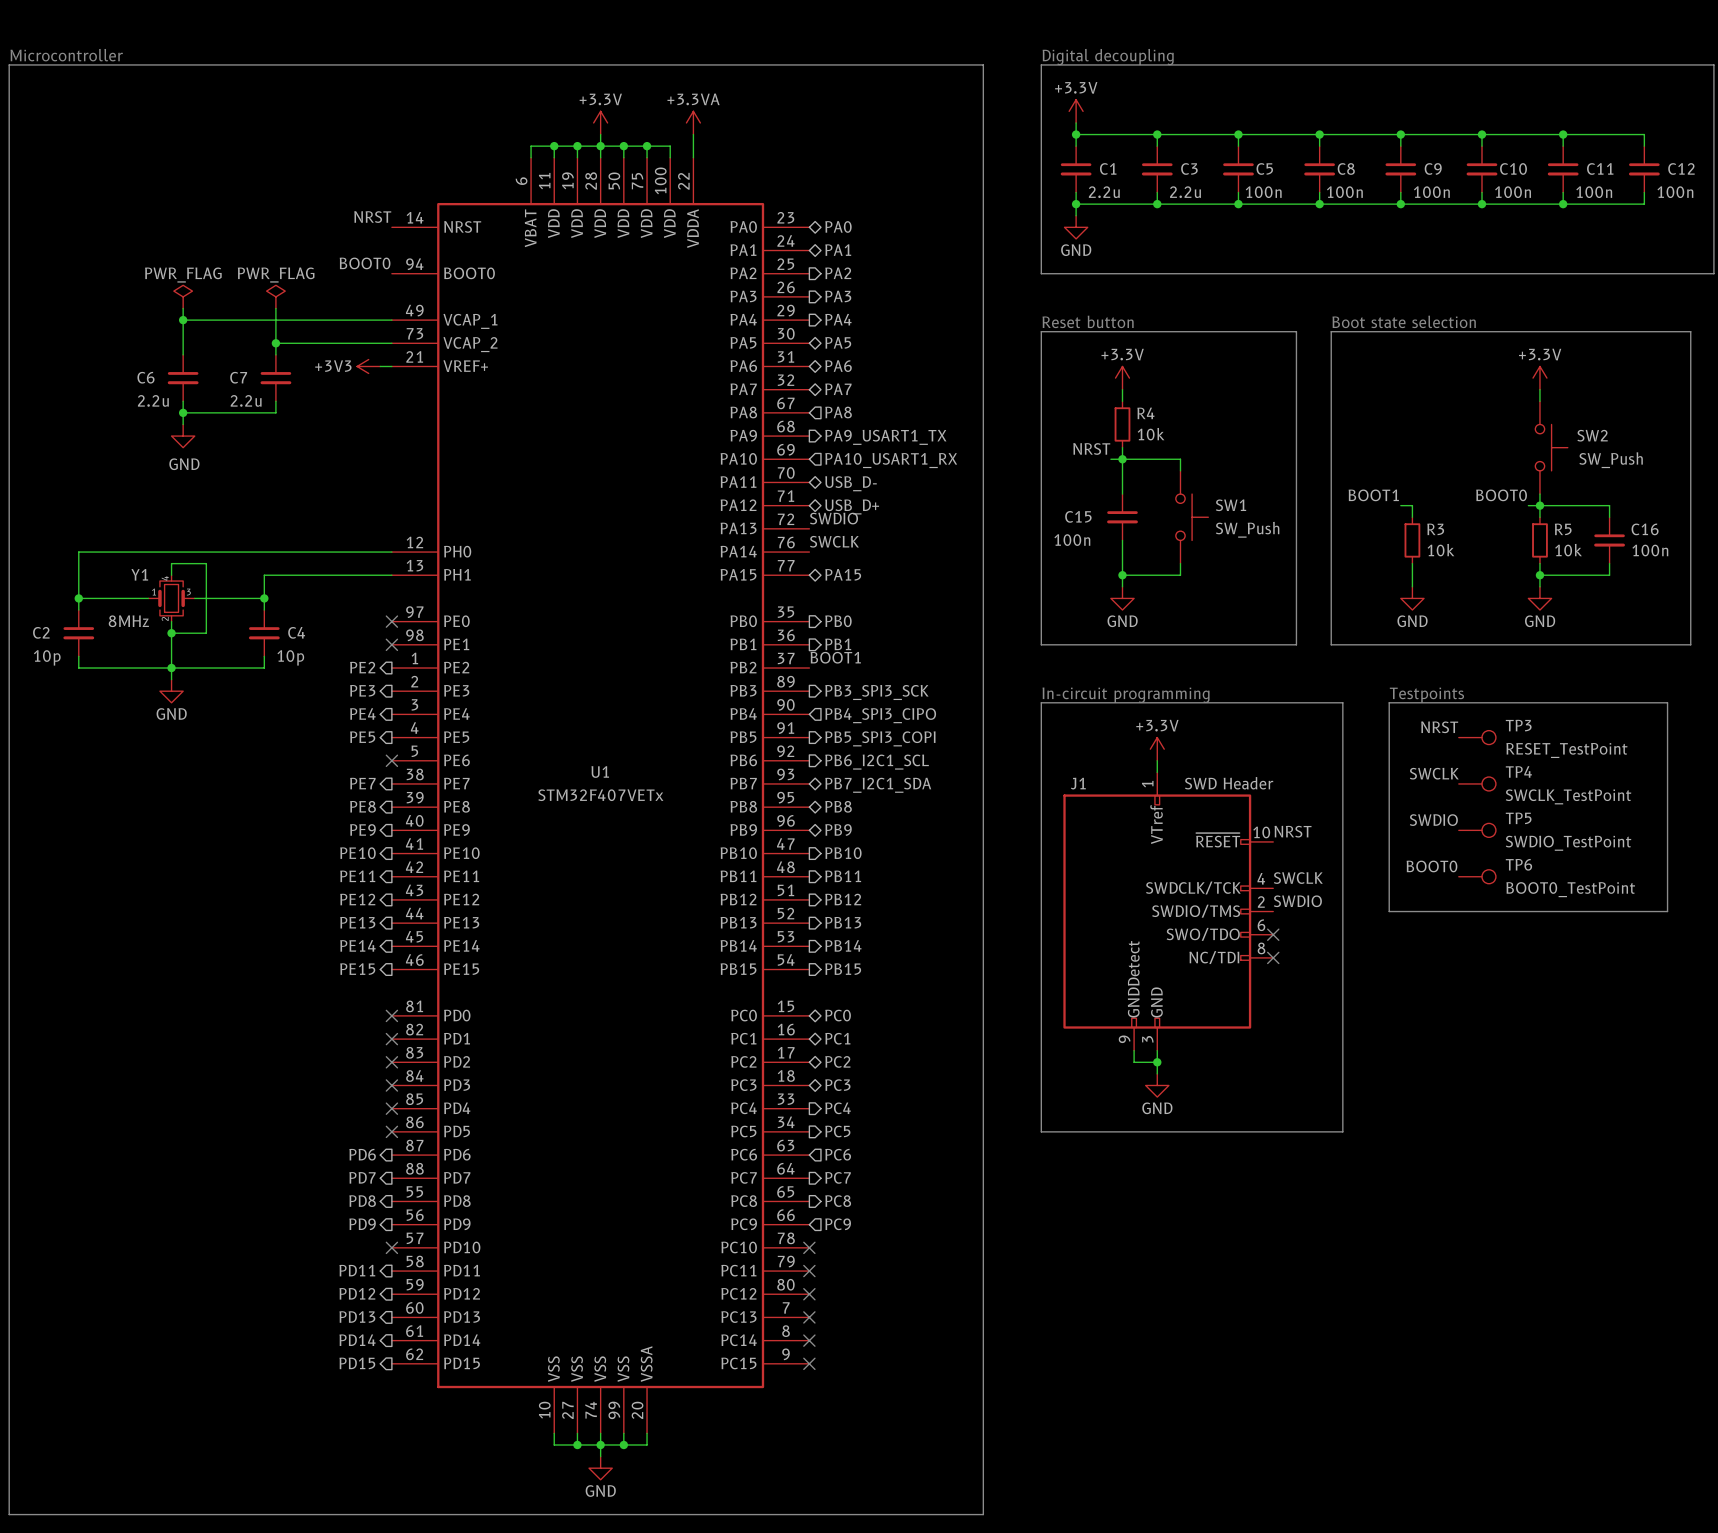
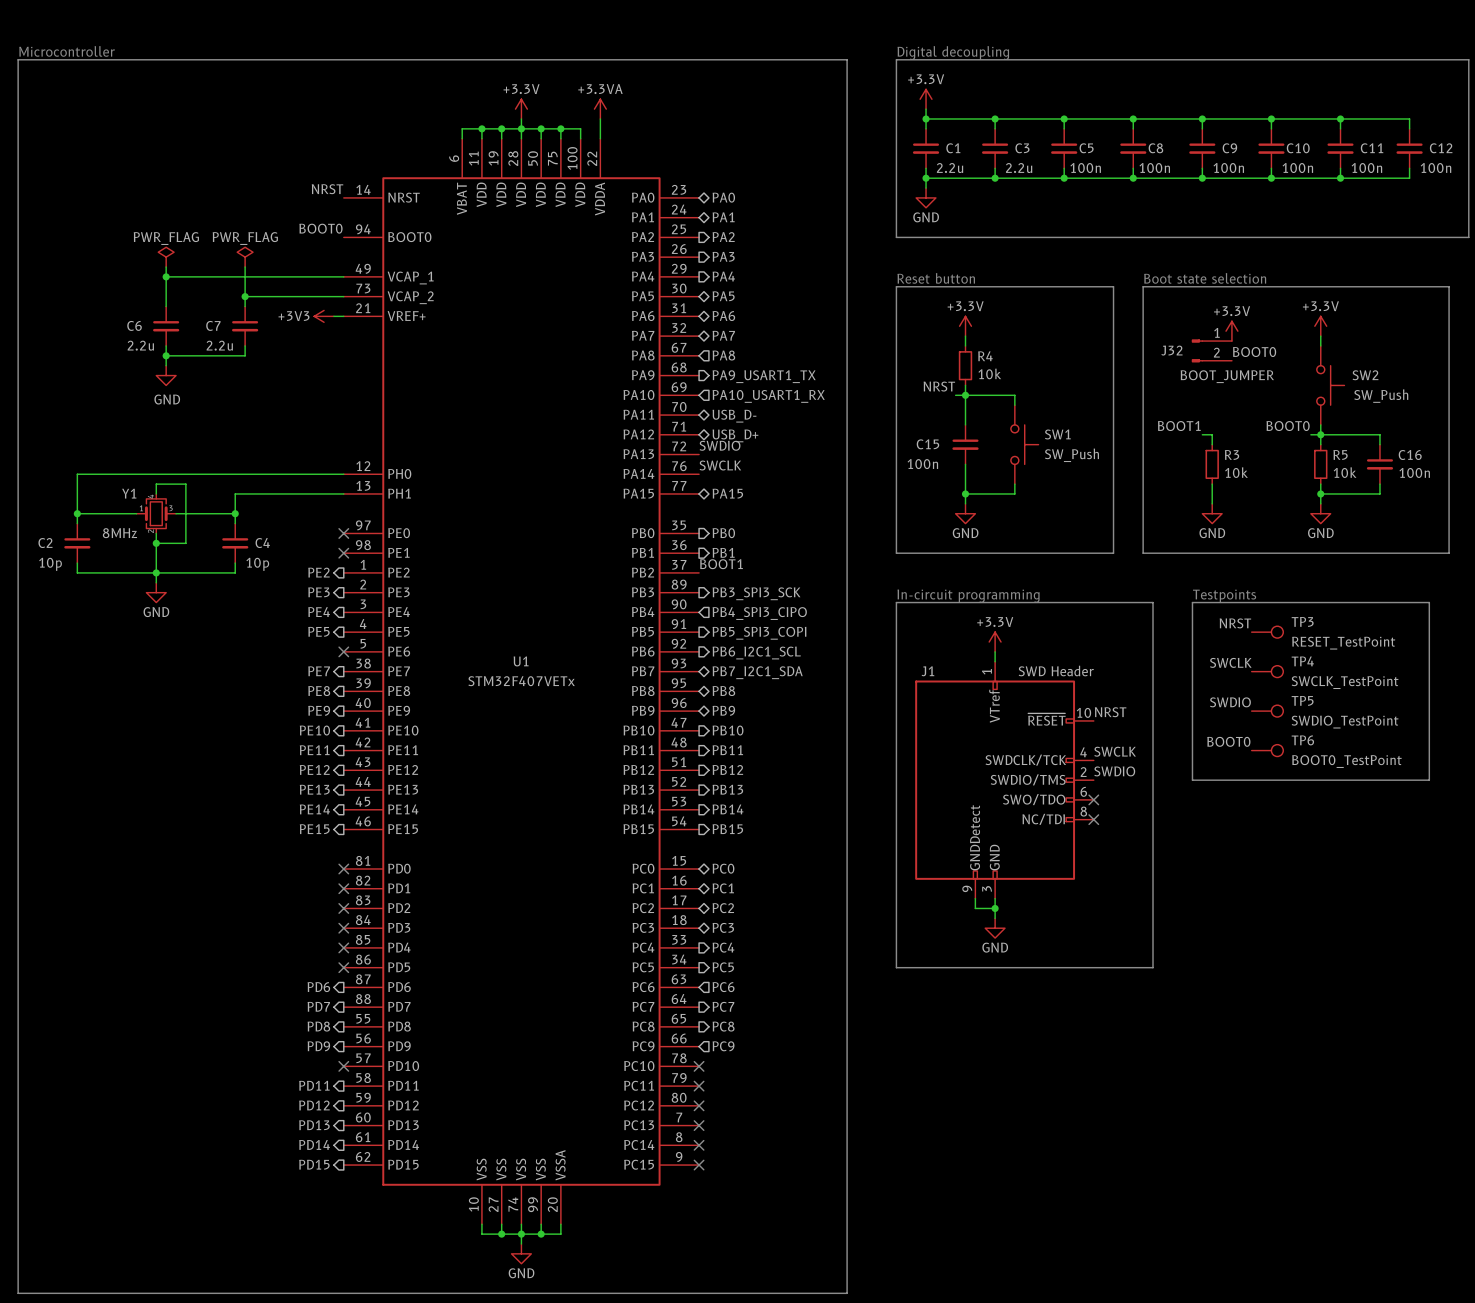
power symbol: none -> +3.3V (1231, 331)
J32: none -> BOOT_JUMPER (1211, 350)
label: none -> BOOT0 (1254, 352)

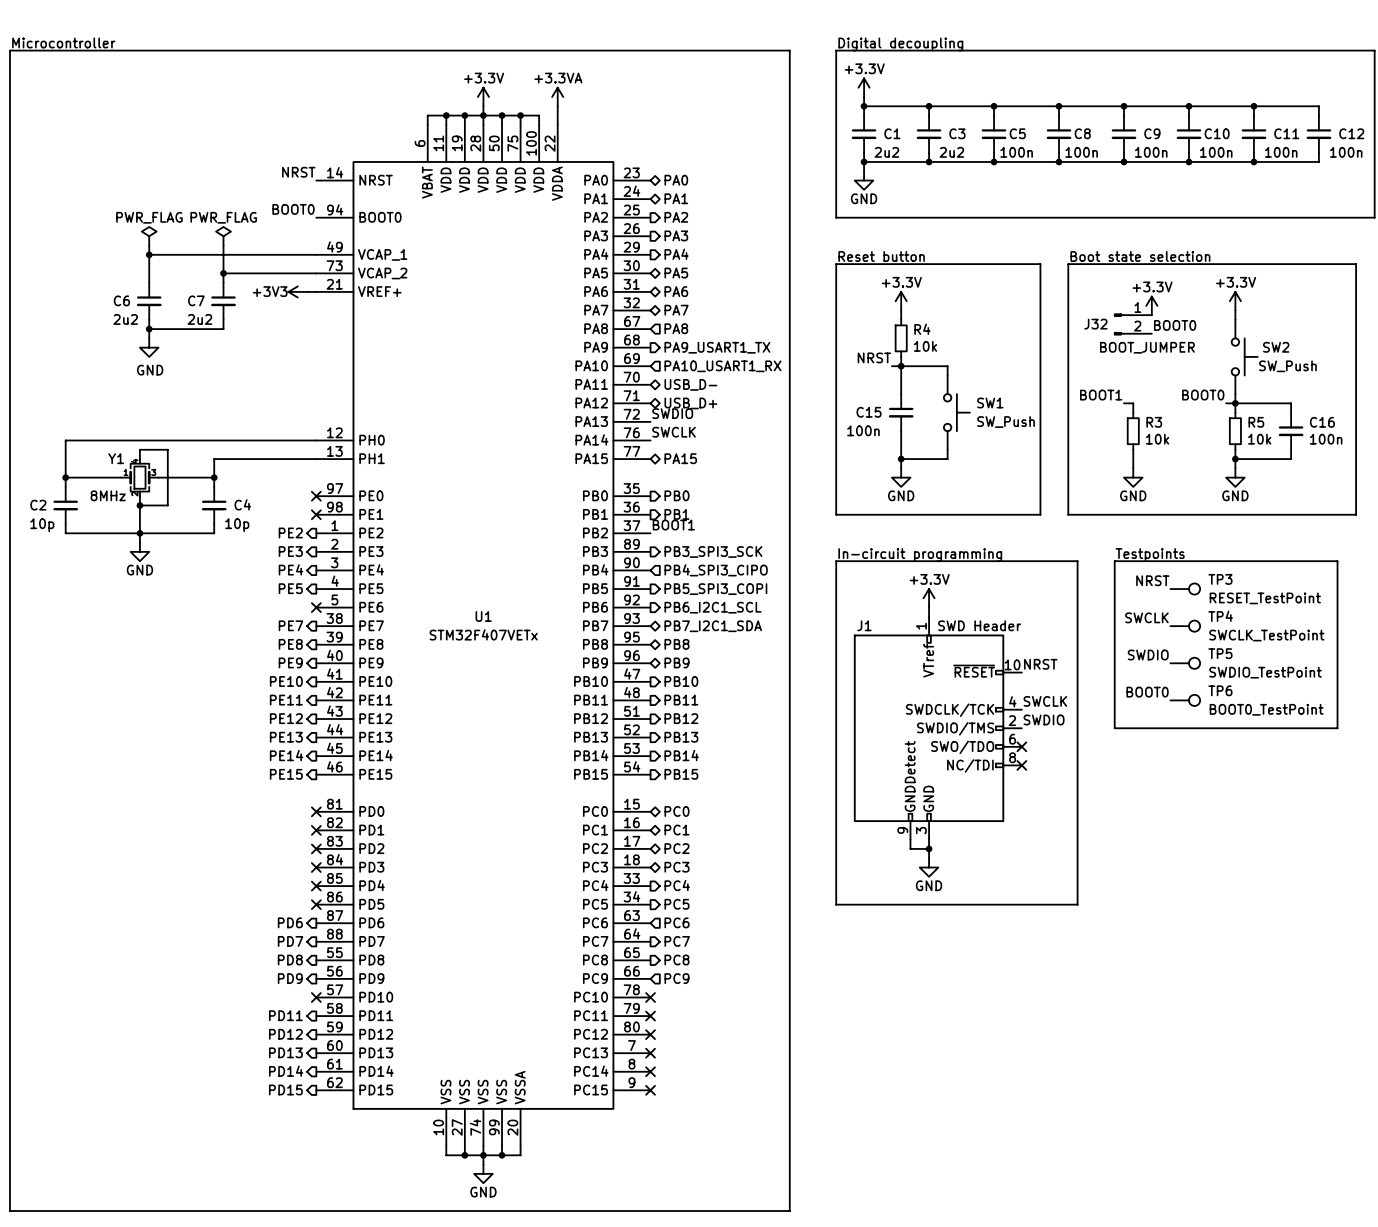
C1 value: 2.2u (950, 168) -> 2u2 (886, 152)
C3 value: 2.2u (1019, 168) -> 2u2 (951, 152)
C6 value: 2.2u (140, 345) -> 2u2 (125, 319)
C7 value: 2.2u (219, 345) -> 2u2 (199, 319)

